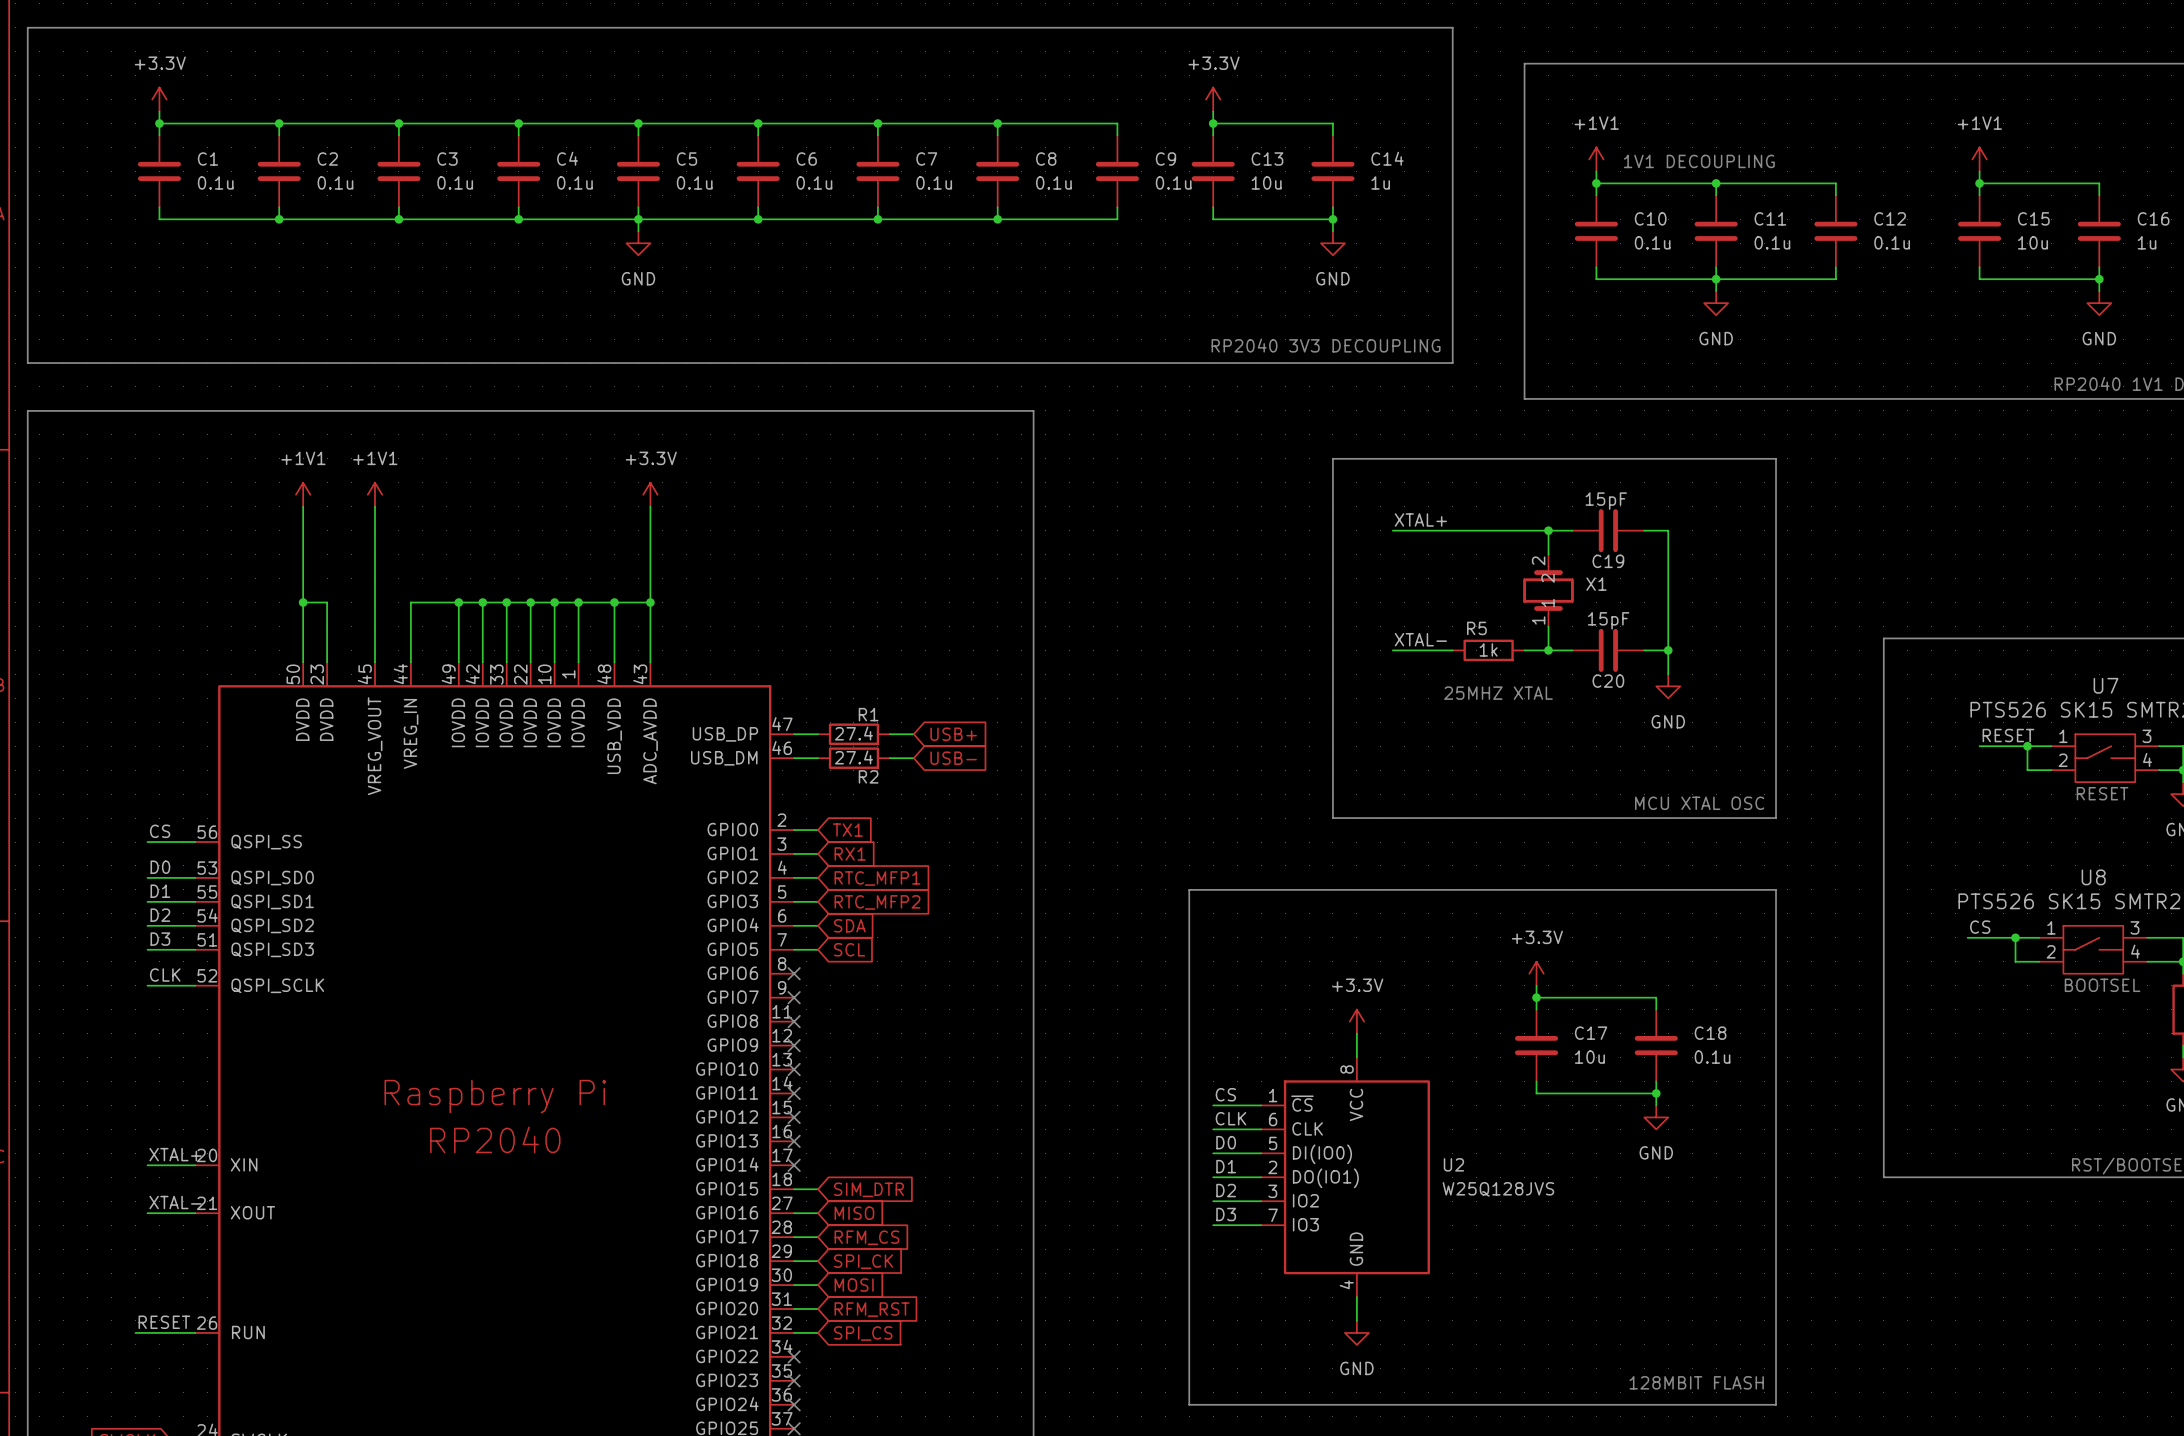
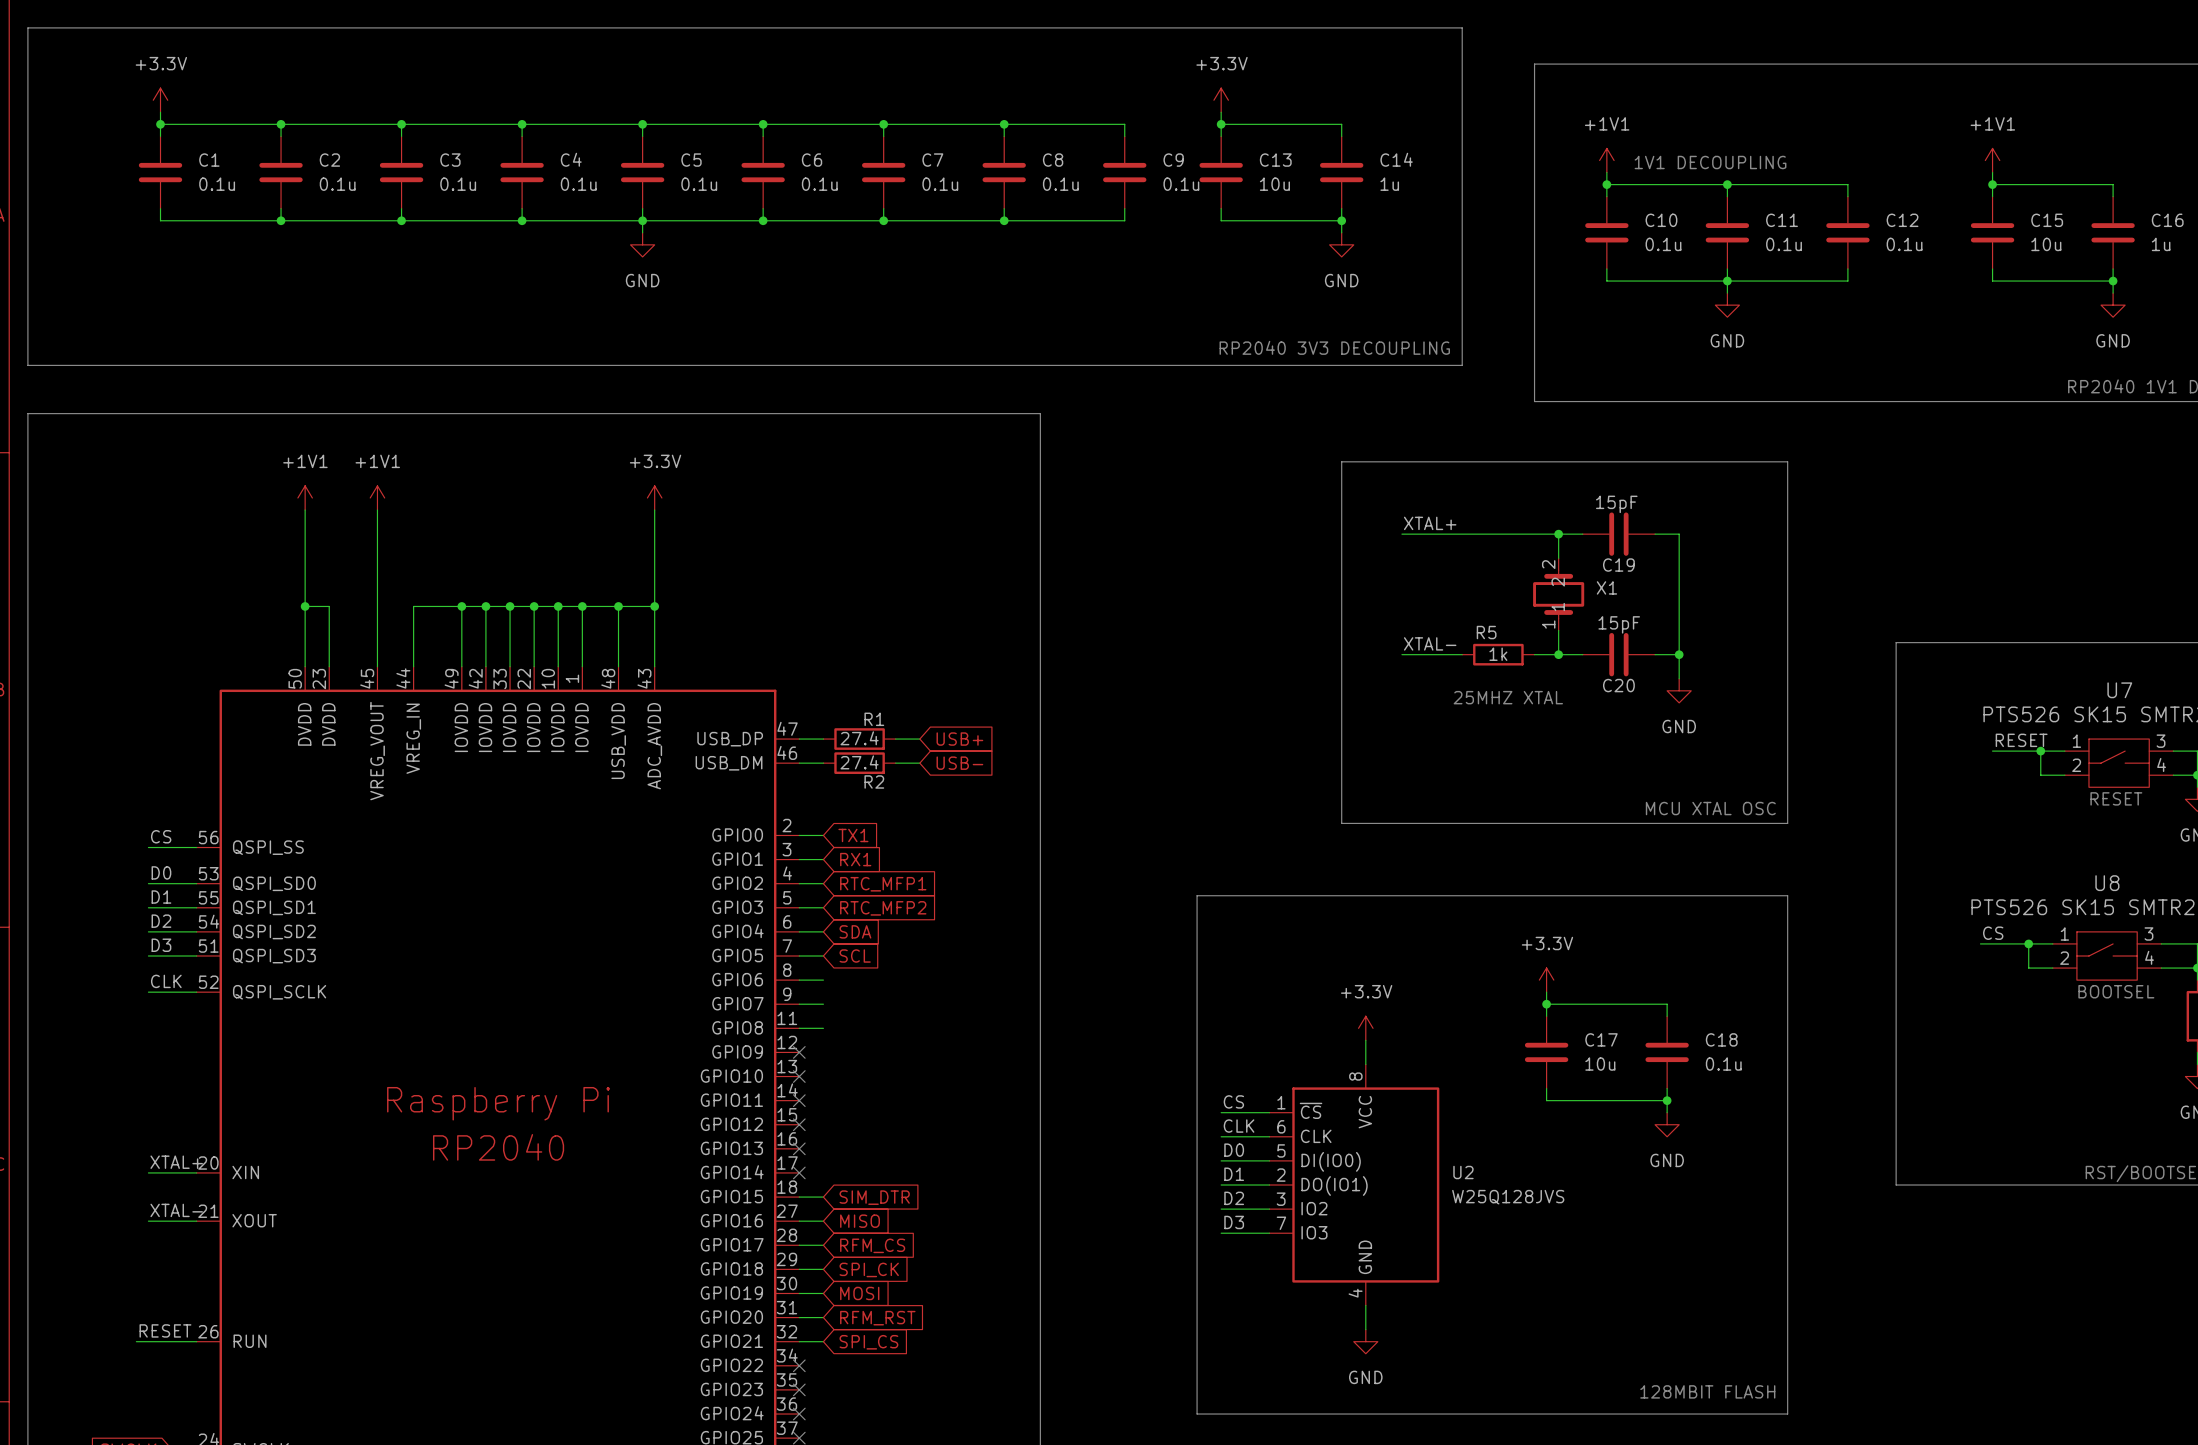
wire: none -> (799, 980) (823, 980)
no-connect mark: (794, 973) -> none
wire: none -> (799, 1004) (823, 1004)
no-connect mark: (794, 997) -> none
wire: none -> (799, 1028) (823, 1028)
no-connect mark: (794, 1021) -> none

